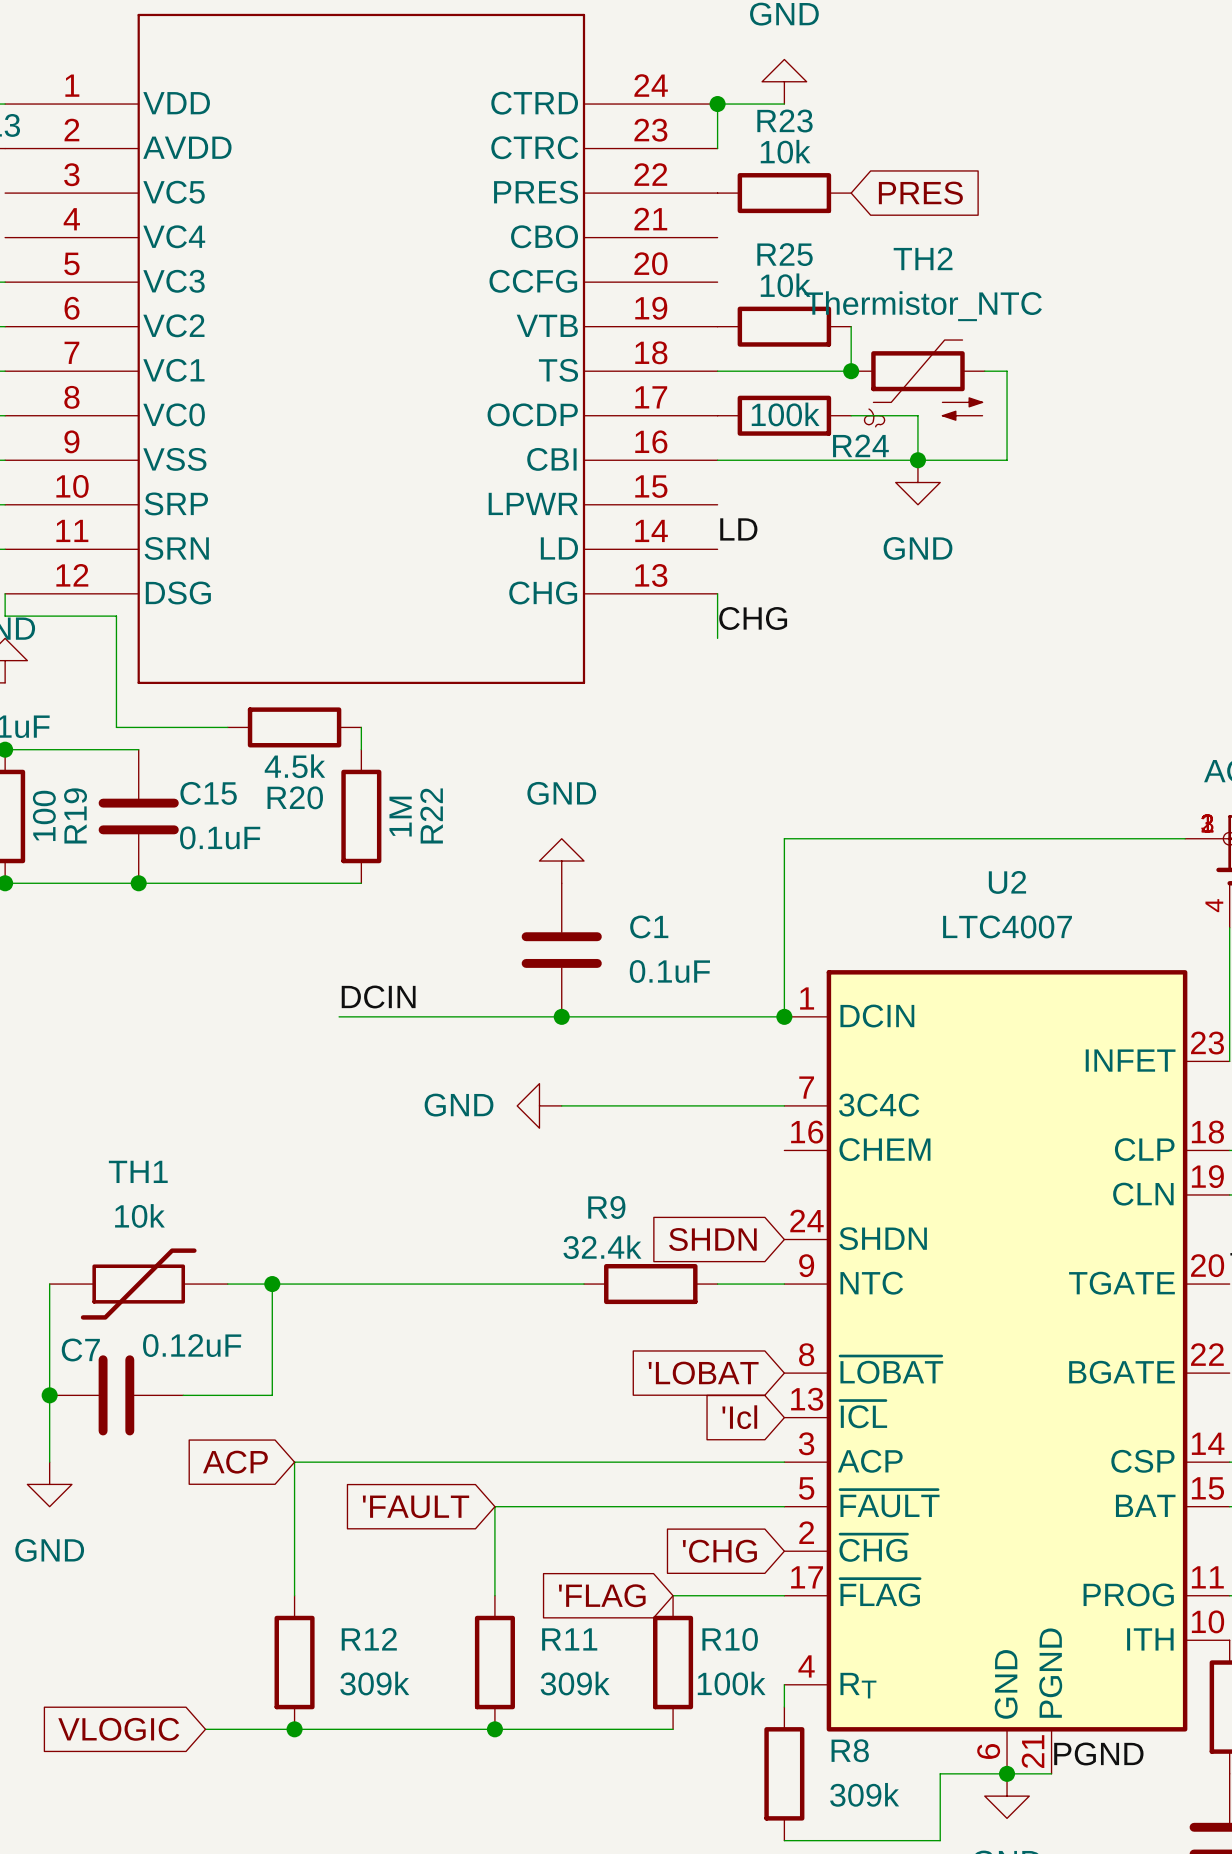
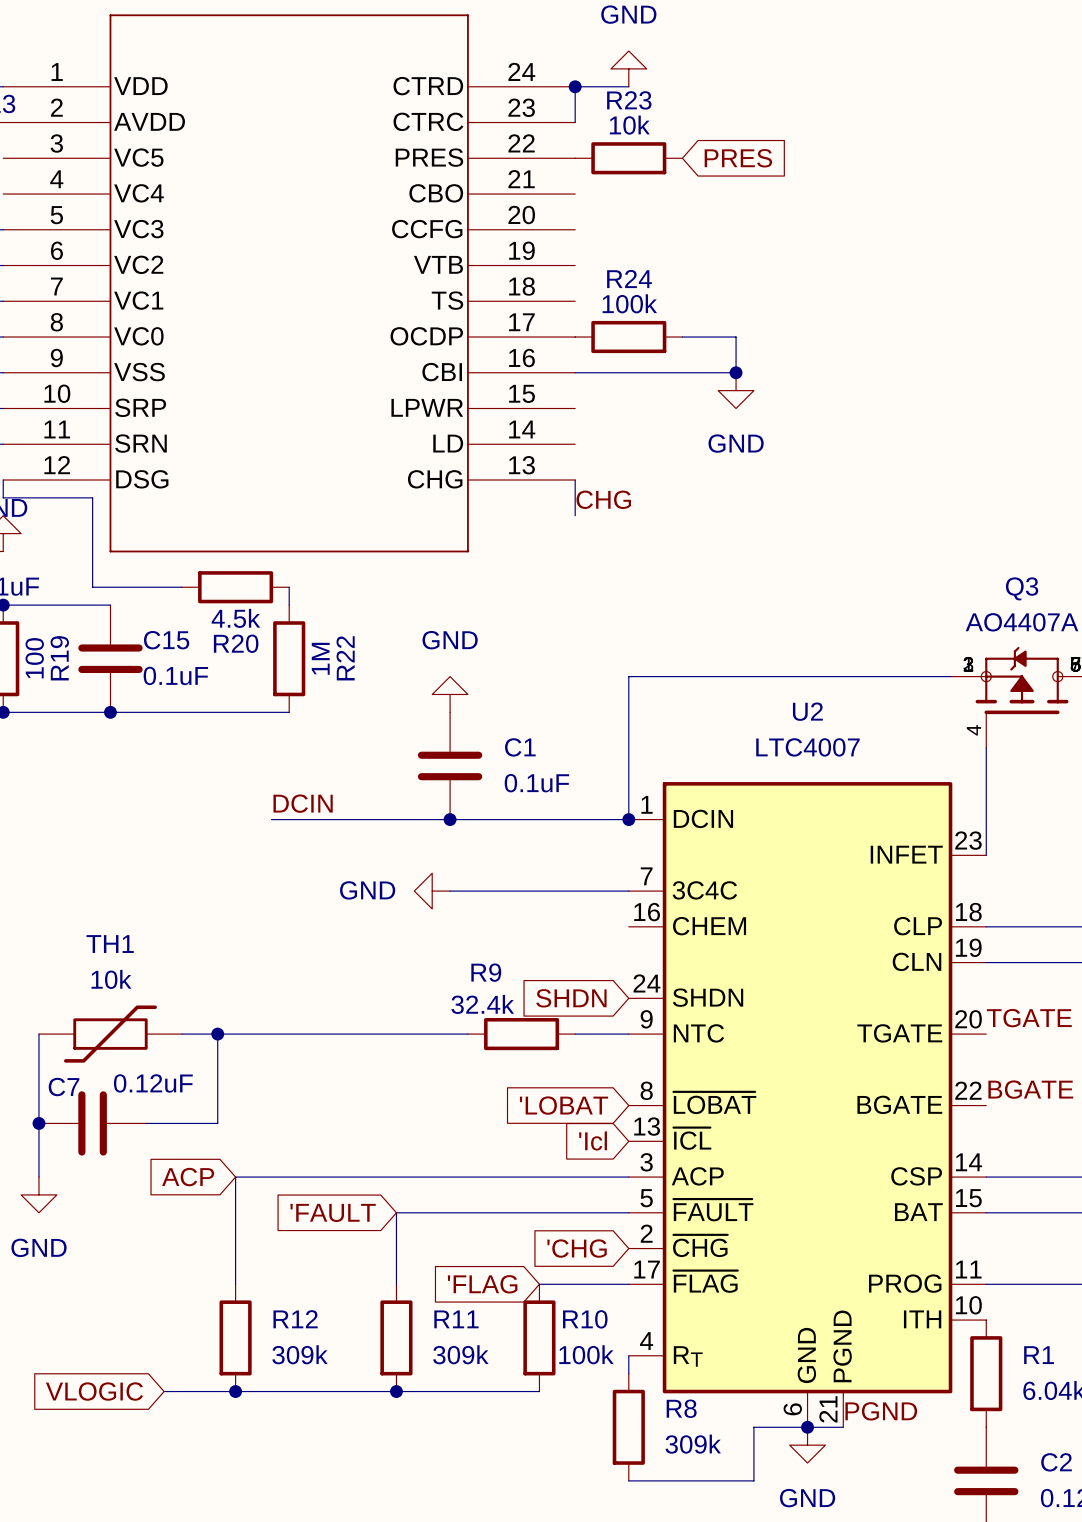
R25: 10k (784, 326) -> none
wire: (851, 326) (851, 371) (717, 371) -> none
junction: (851, 371) -> none
wire: (984, 371) (1007, 371) (1007, 460) (917, 460) -> none
TH2: Thermistor_NTC (917, 383) -> none
R24 value position: 100k (785, 414) -> 100k (629, 303)
R24 name position: R24 (860, 445) -> R24 (629, 279)
label: LD (738, 529) -> none

